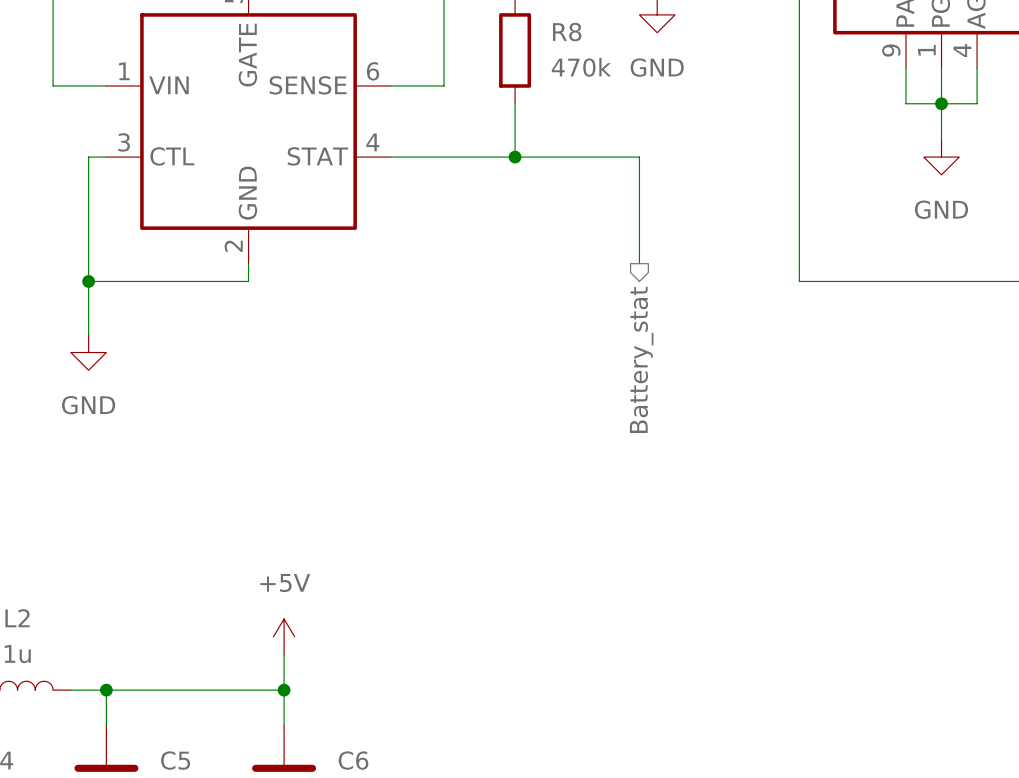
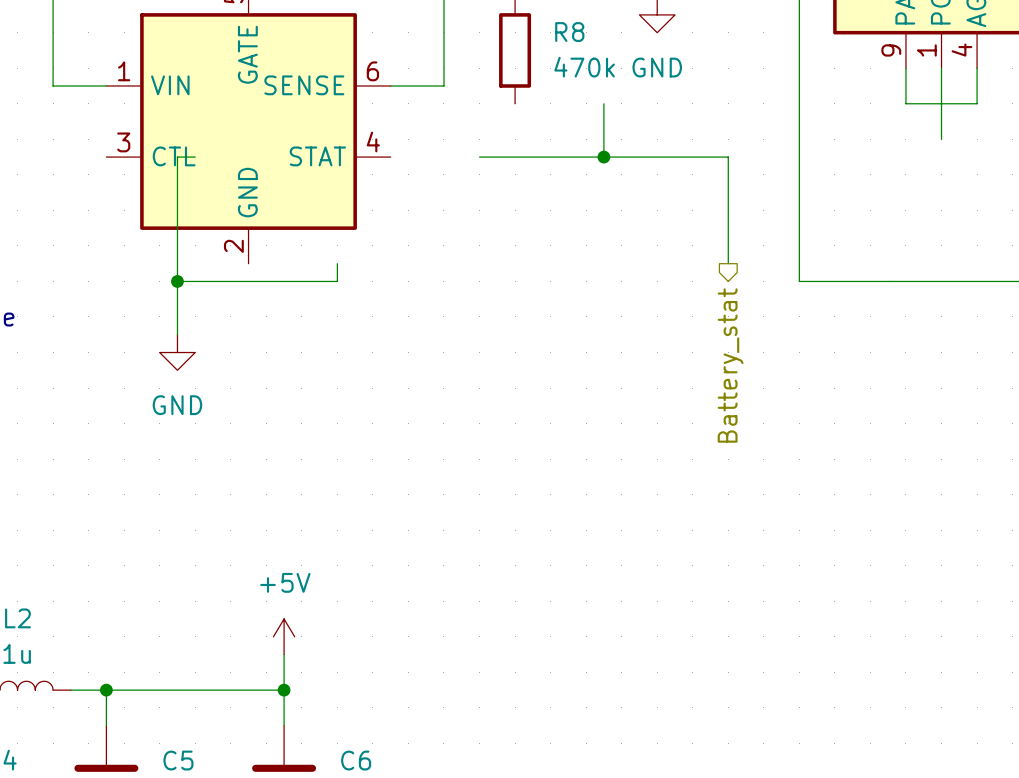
wire: (515, 103) (515, 157) -> (603, 103) (603, 157)
junction: (941, 103) -> none
wire: (106, 157) (88, 157) (88, 334) -> (195, 157) (177, 157) (177, 334)
wire: (390, 157) (479, 157) -> none
junction: (515, 157) -> none
junction: none -> (603, 157)
wire: (639, 157) (639, 263) -> (639, 157) (728, 157) (728, 263)
power symbol: GND (941, 157) -> none
wire: (248, 263) (248, 281) -> (337, 263) (337, 281) (248, 281)
wire: (88, 281) (177, 281) -> none
junction: (88, 281) -> none
junction: none -> (177, 281)
power symbol position: GND (88, 352) -> GND (177, 352)
hierarchical label position: Battery_stat (641, 359) -> Battery_stat (730, 365)

